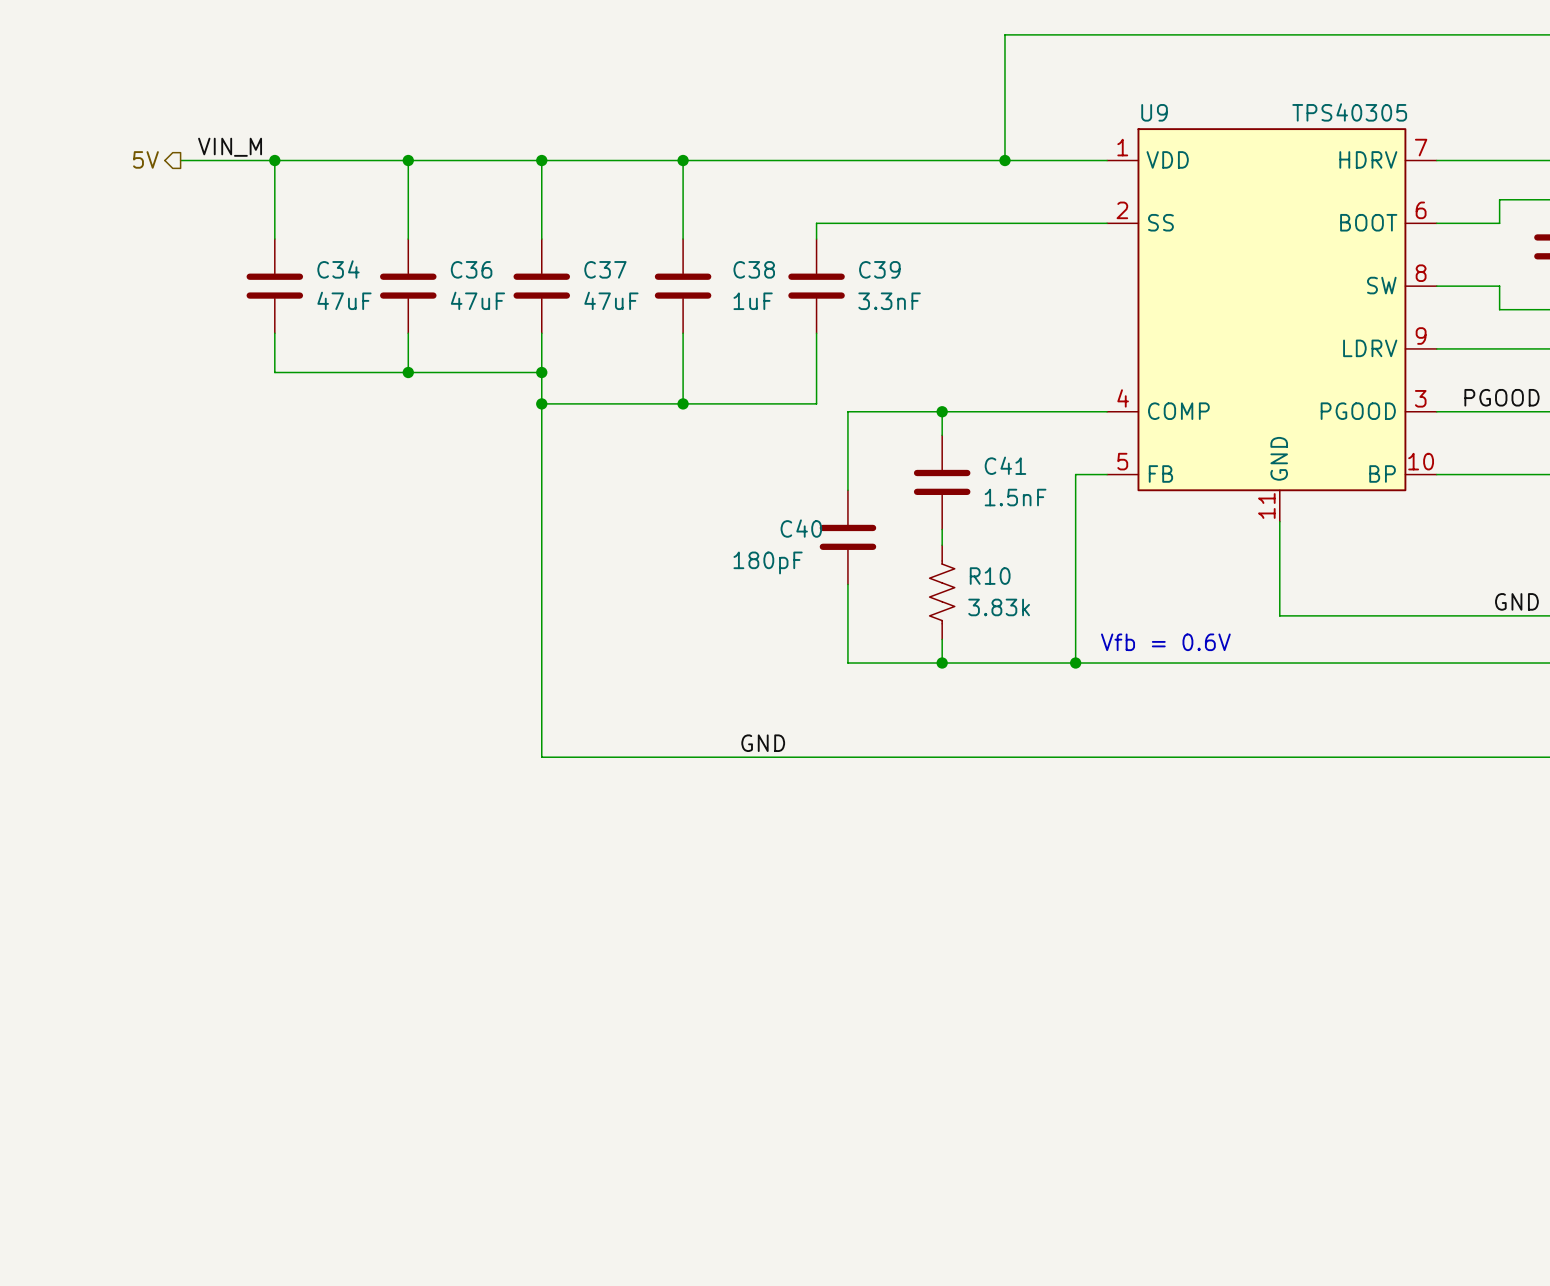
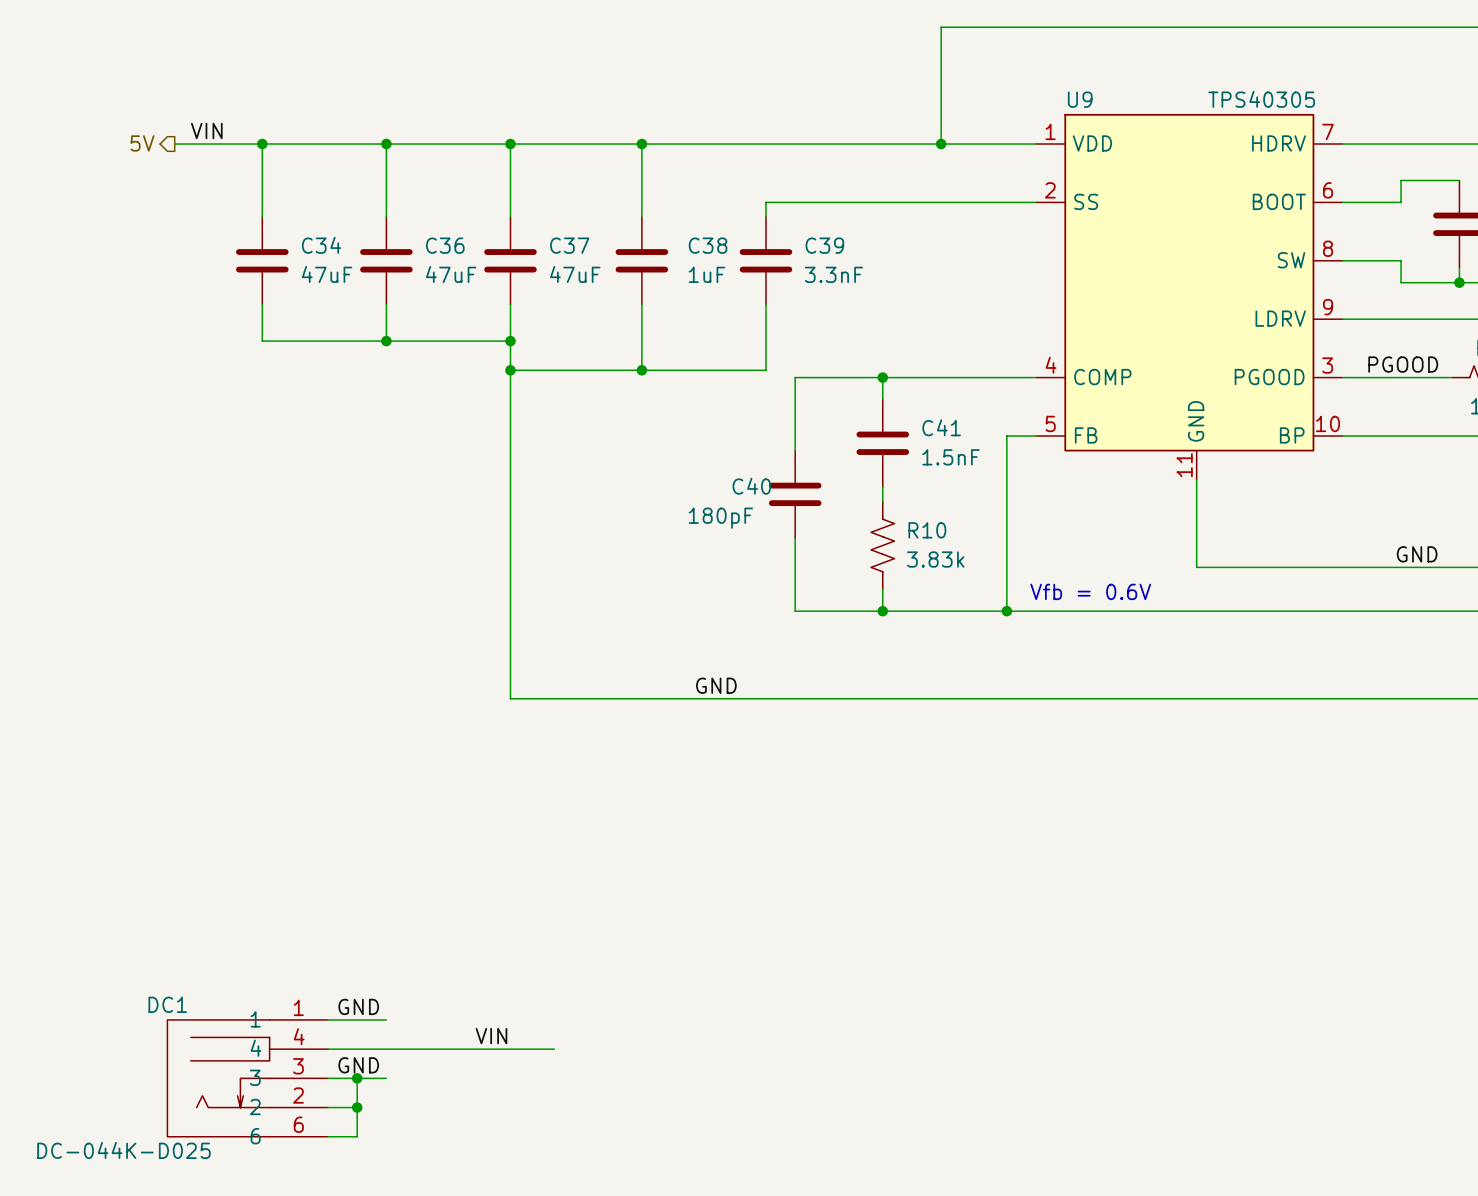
label: VIN_M (230, 147) -> VIN (206, 130)
label: none -> GND (358, 1006)
wire: none -> (328, 1019) (386, 1019)
label: none -> VIN (491, 1036)
wire: none -> (328, 1049) (554, 1049)
label: none -> GND (358, 1065)
DC1: none -> DC-044K-D025 (247, 1078)
wire: none -> (328, 1078) (386, 1078)
wire: none -> (357, 1078) (357, 1136) (328, 1136)
junction: none -> (357, 1078)
wire: none -> (328, 1107) (357, 1107)
junction: none -> (357, 1107)

